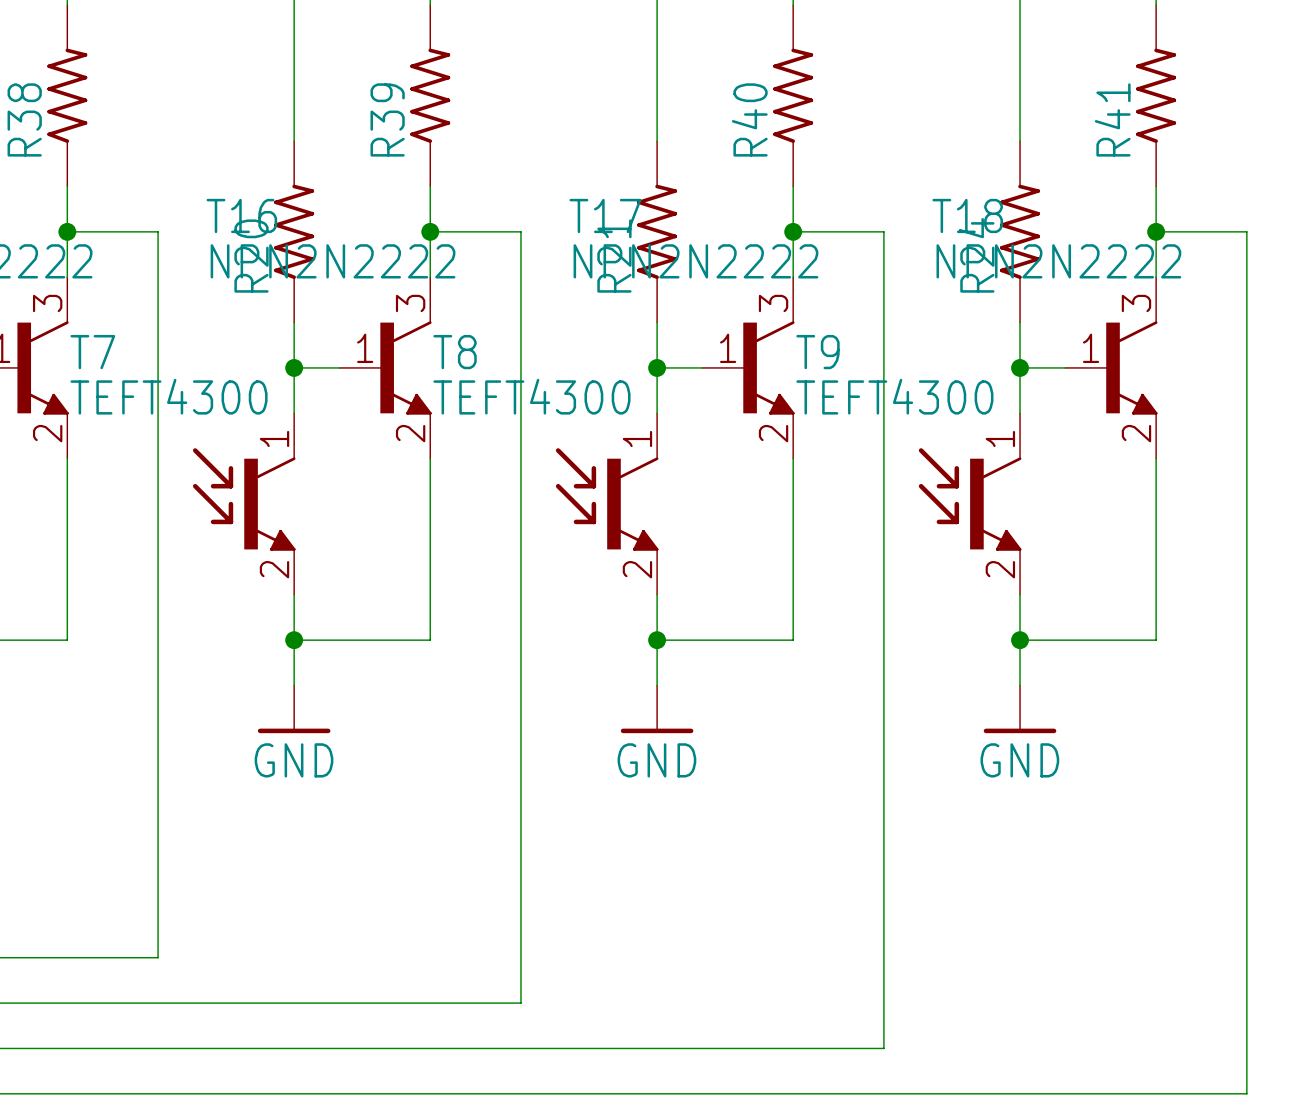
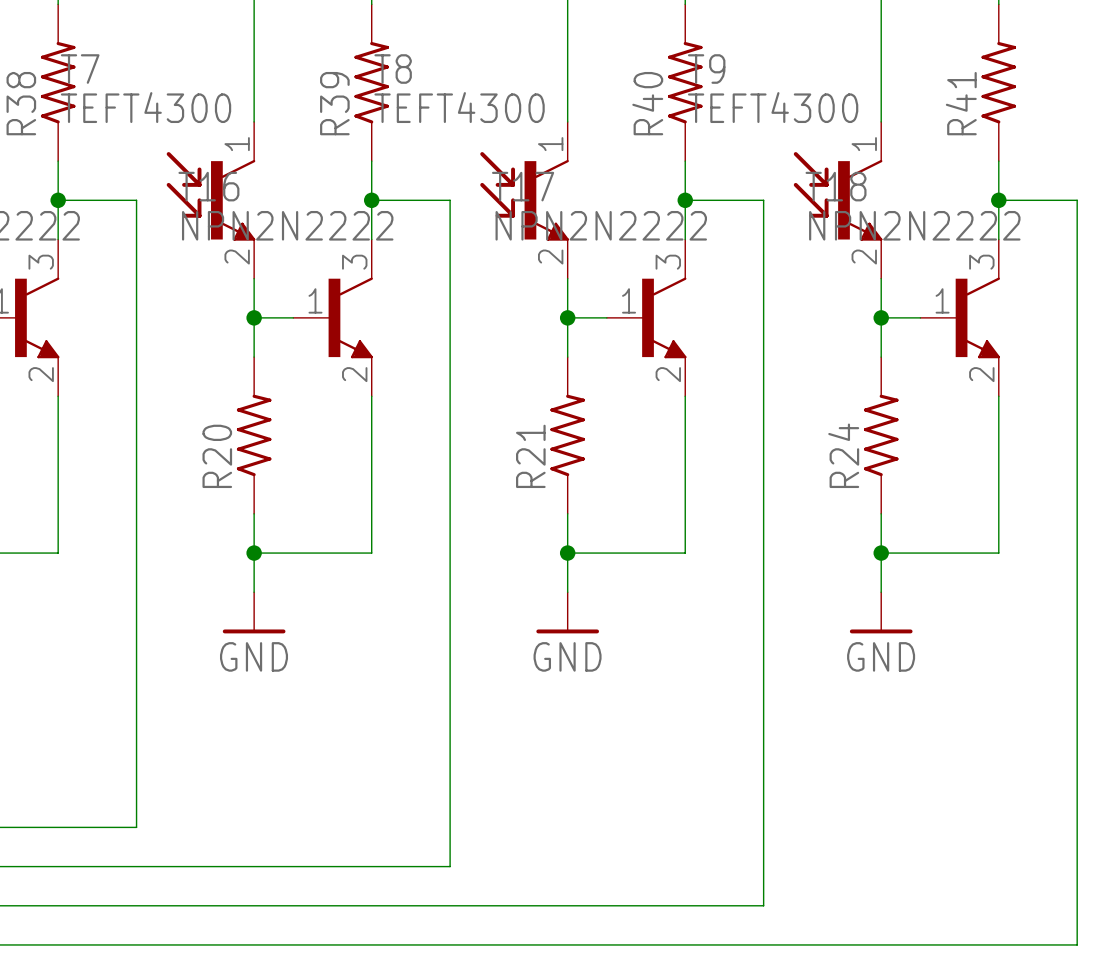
R20 position: (294, 231) -> (254, 435)
R21 position: (657, 231) -> (567, 435)
R24 position: (1020, 231) -> (881, 435)
T7 position: (244, 504) -> (210, 200)
T8 position: (607, 504) -> (524, 200)
T9 position: (970, 504) -> (838, 200)

